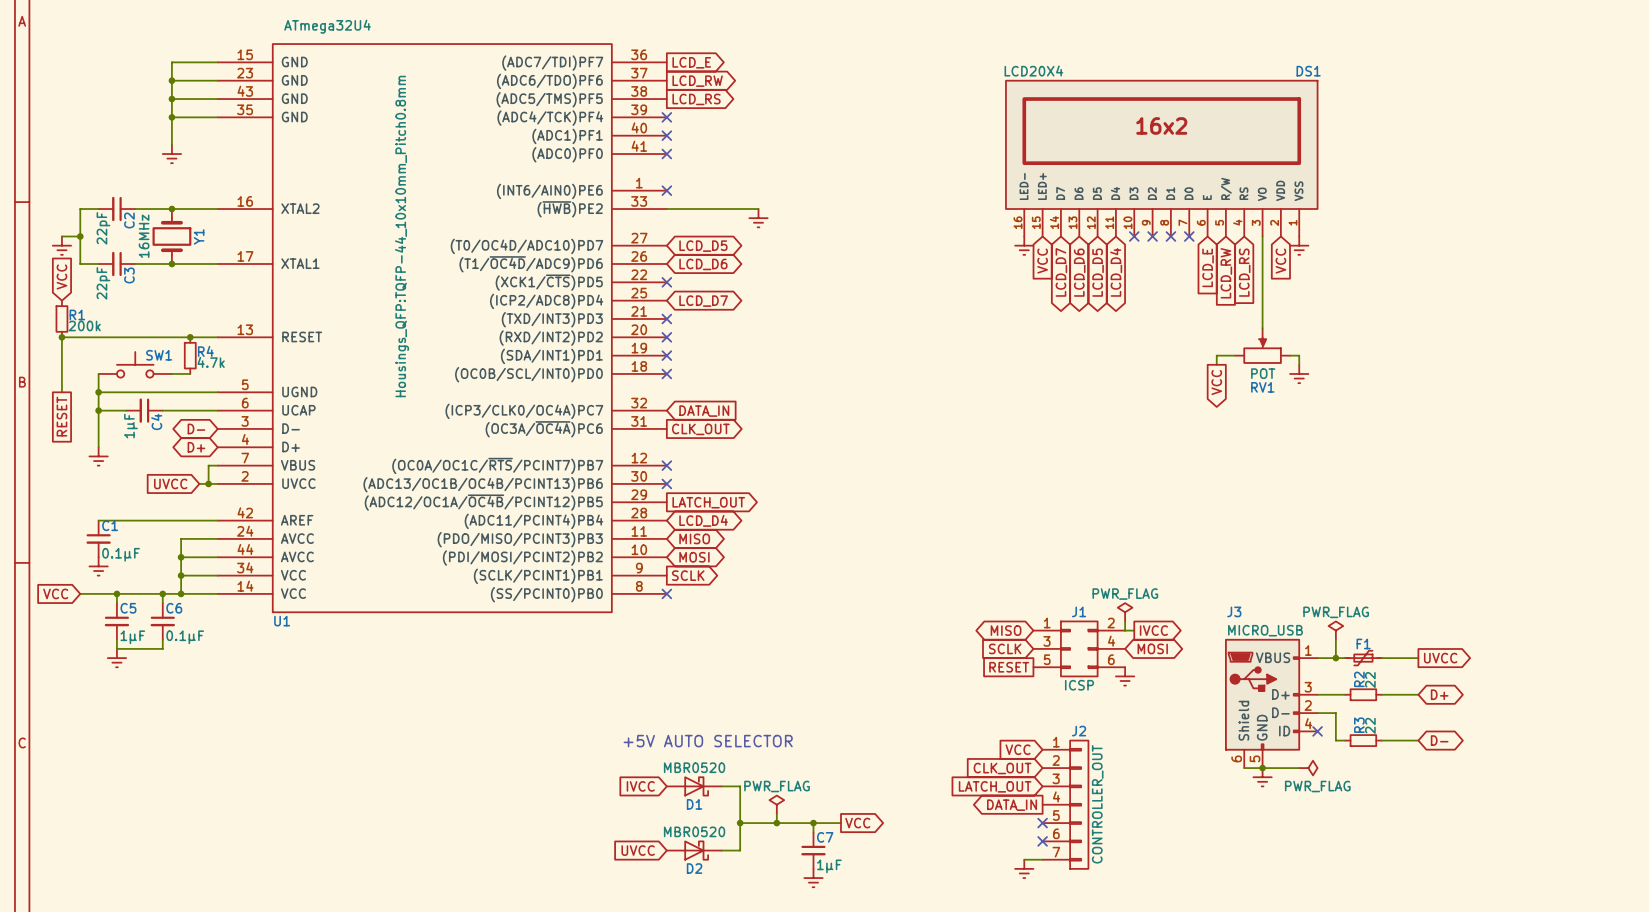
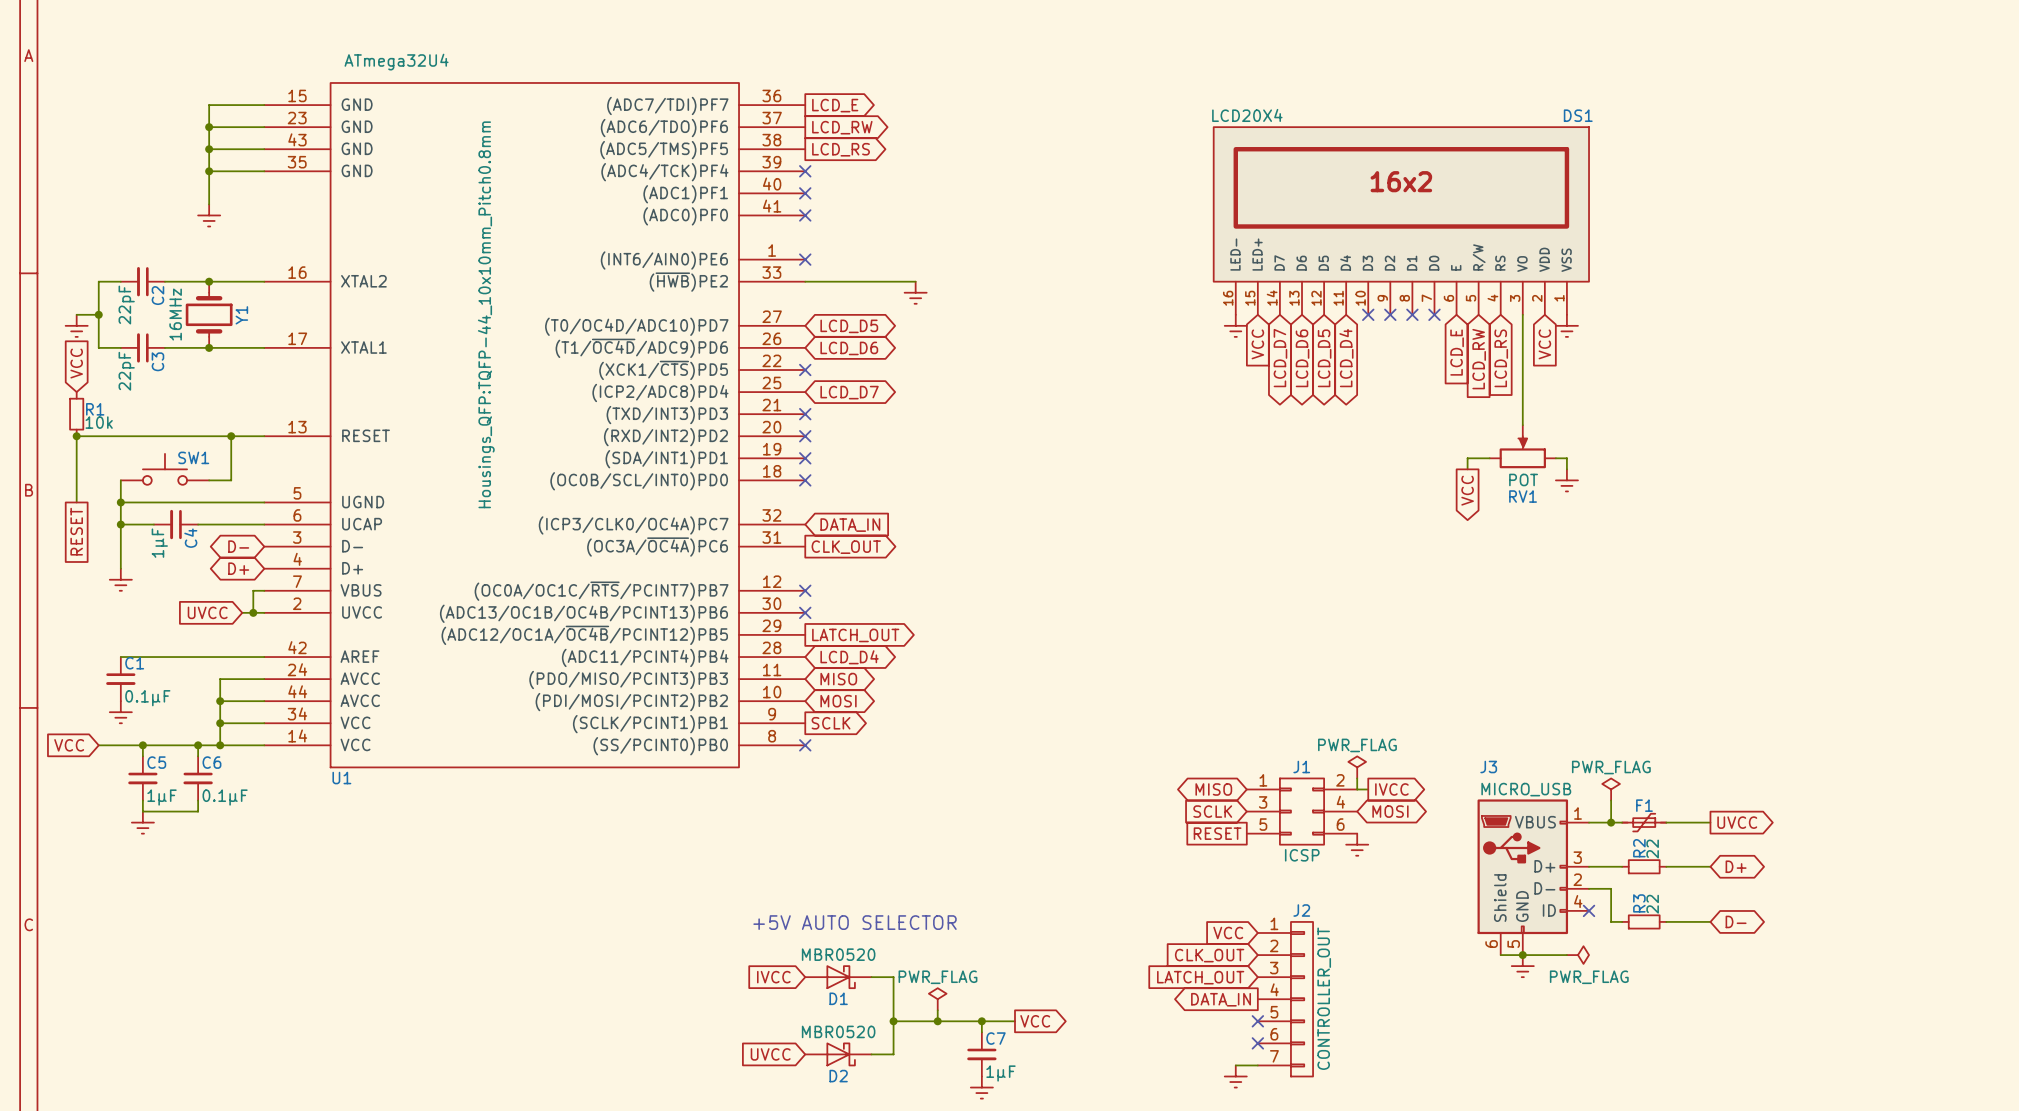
R1 value: 200k (84, 325) -> 10k (99, 422)
wire: none -> (231, 436) (231, 480)
R4: 4.7k (190, 355) -> none

